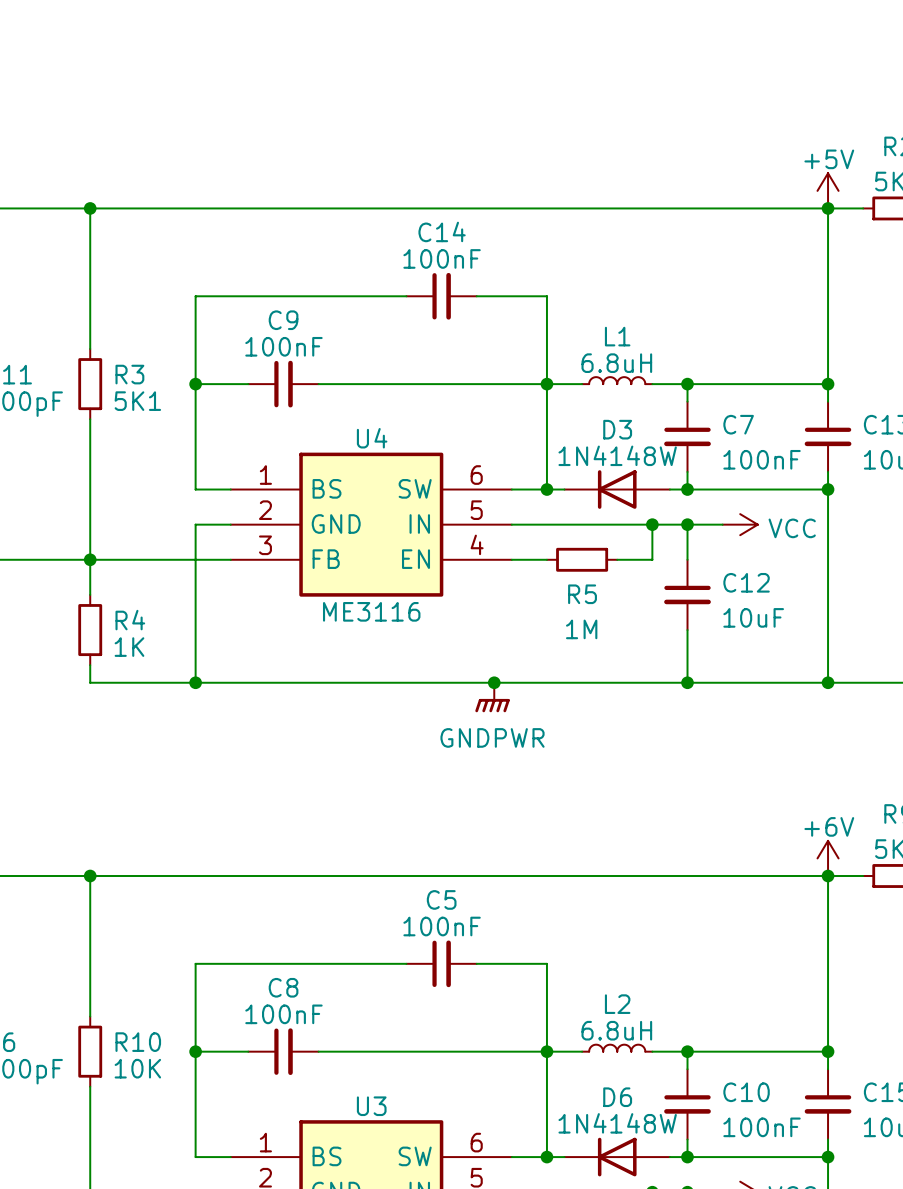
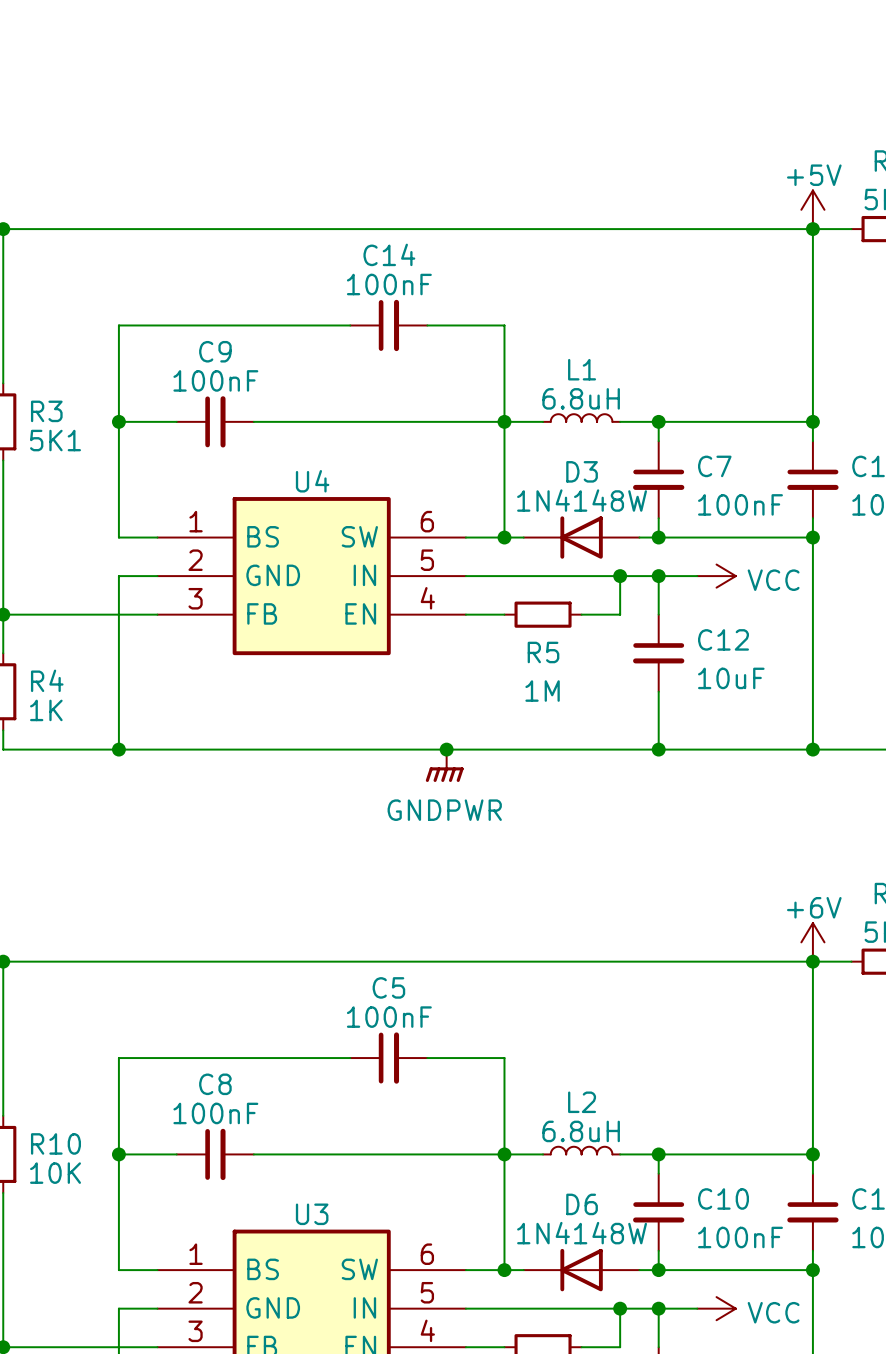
U4 value: ME3116 (371, 611) -> none

